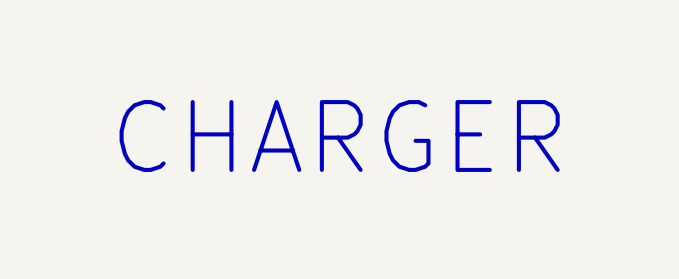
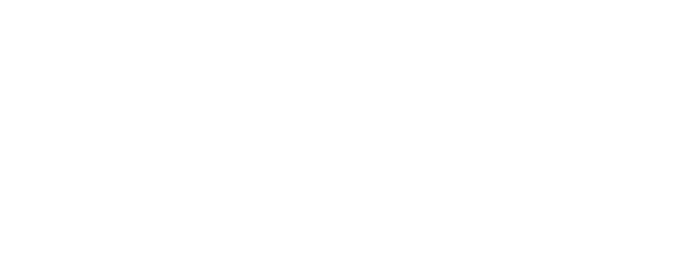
text: CHARGER (339, 135) -> none

